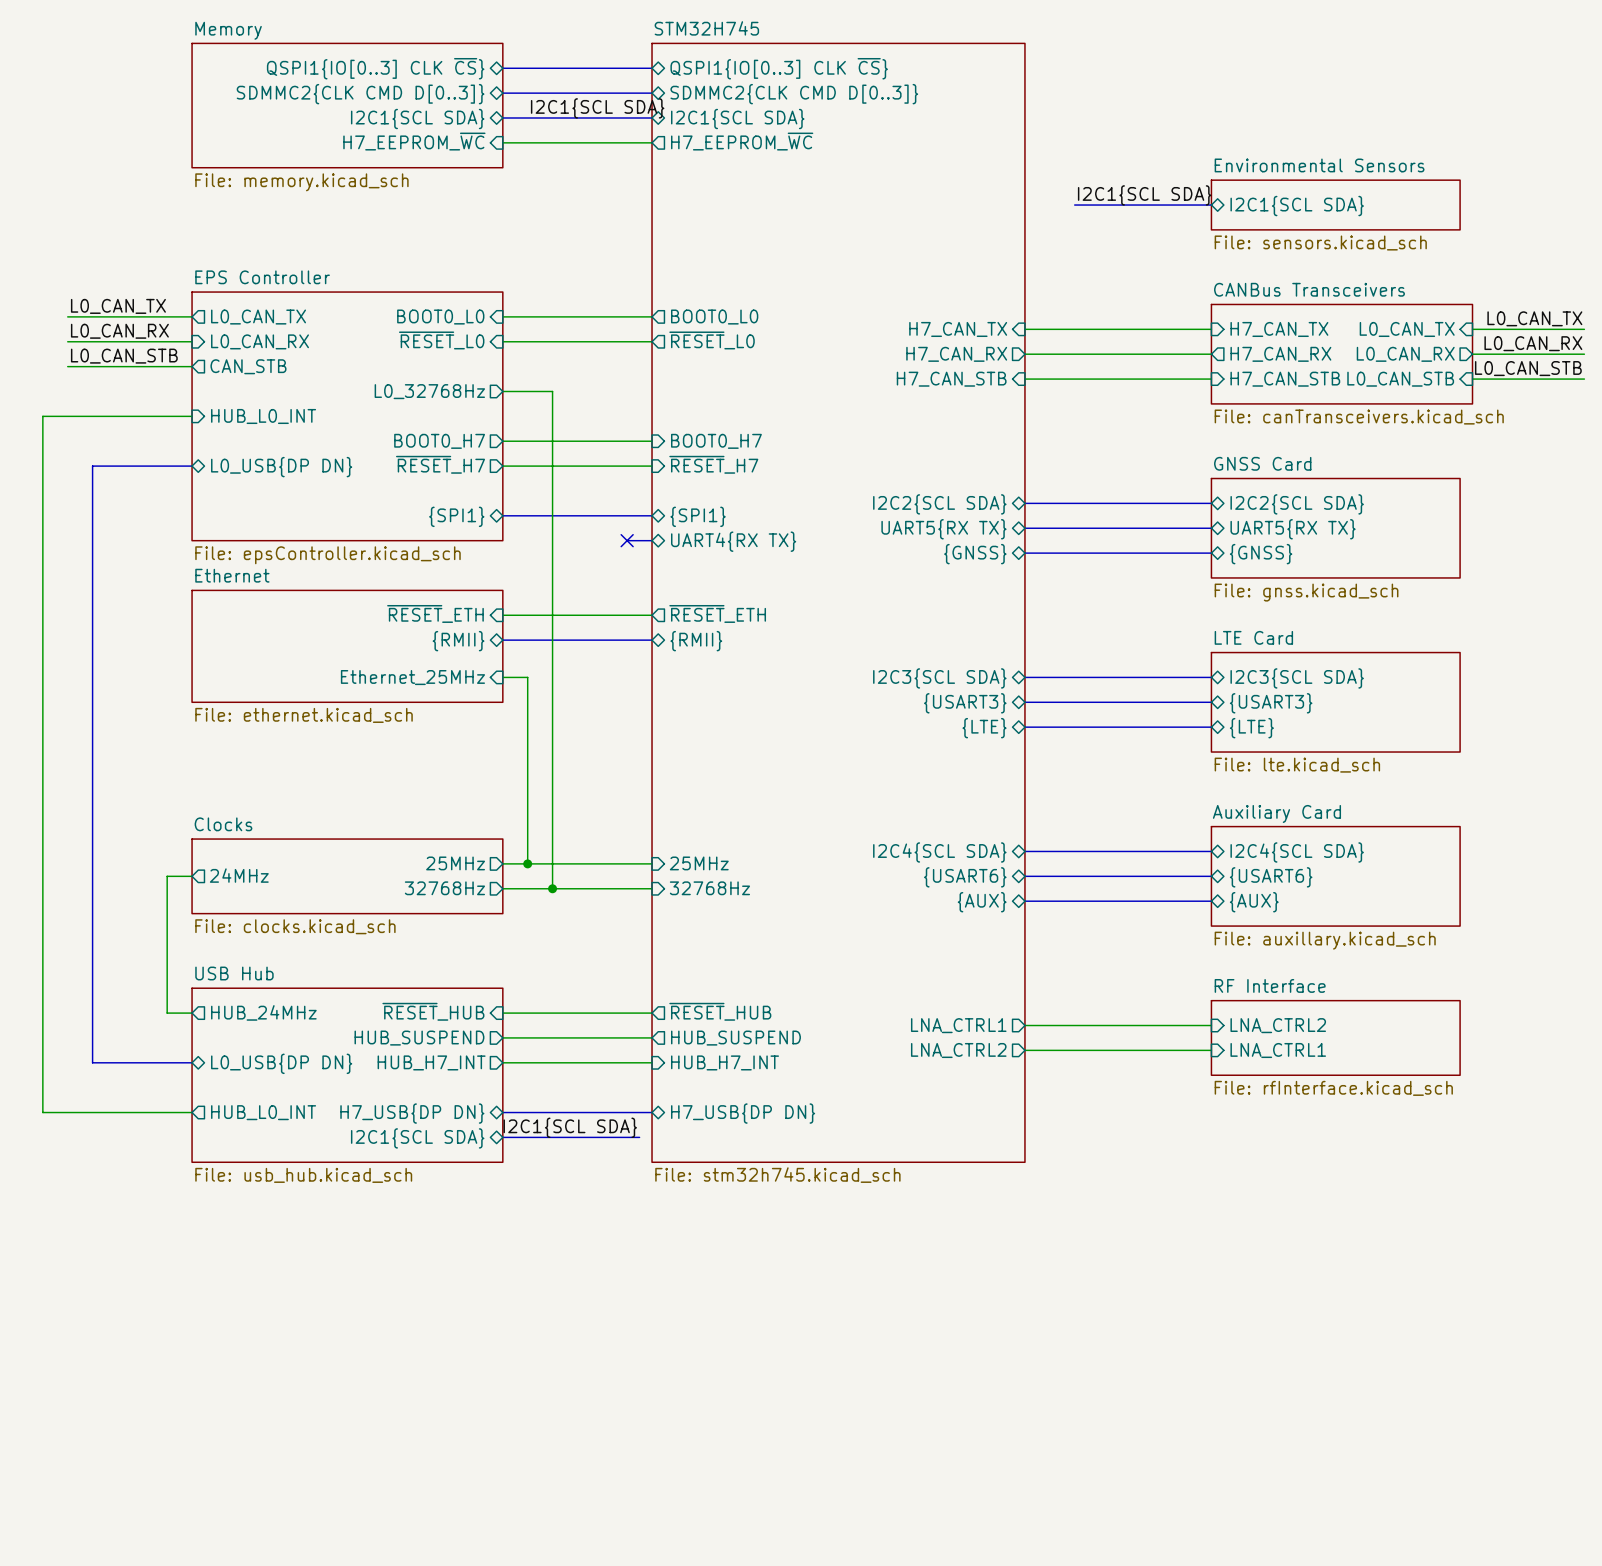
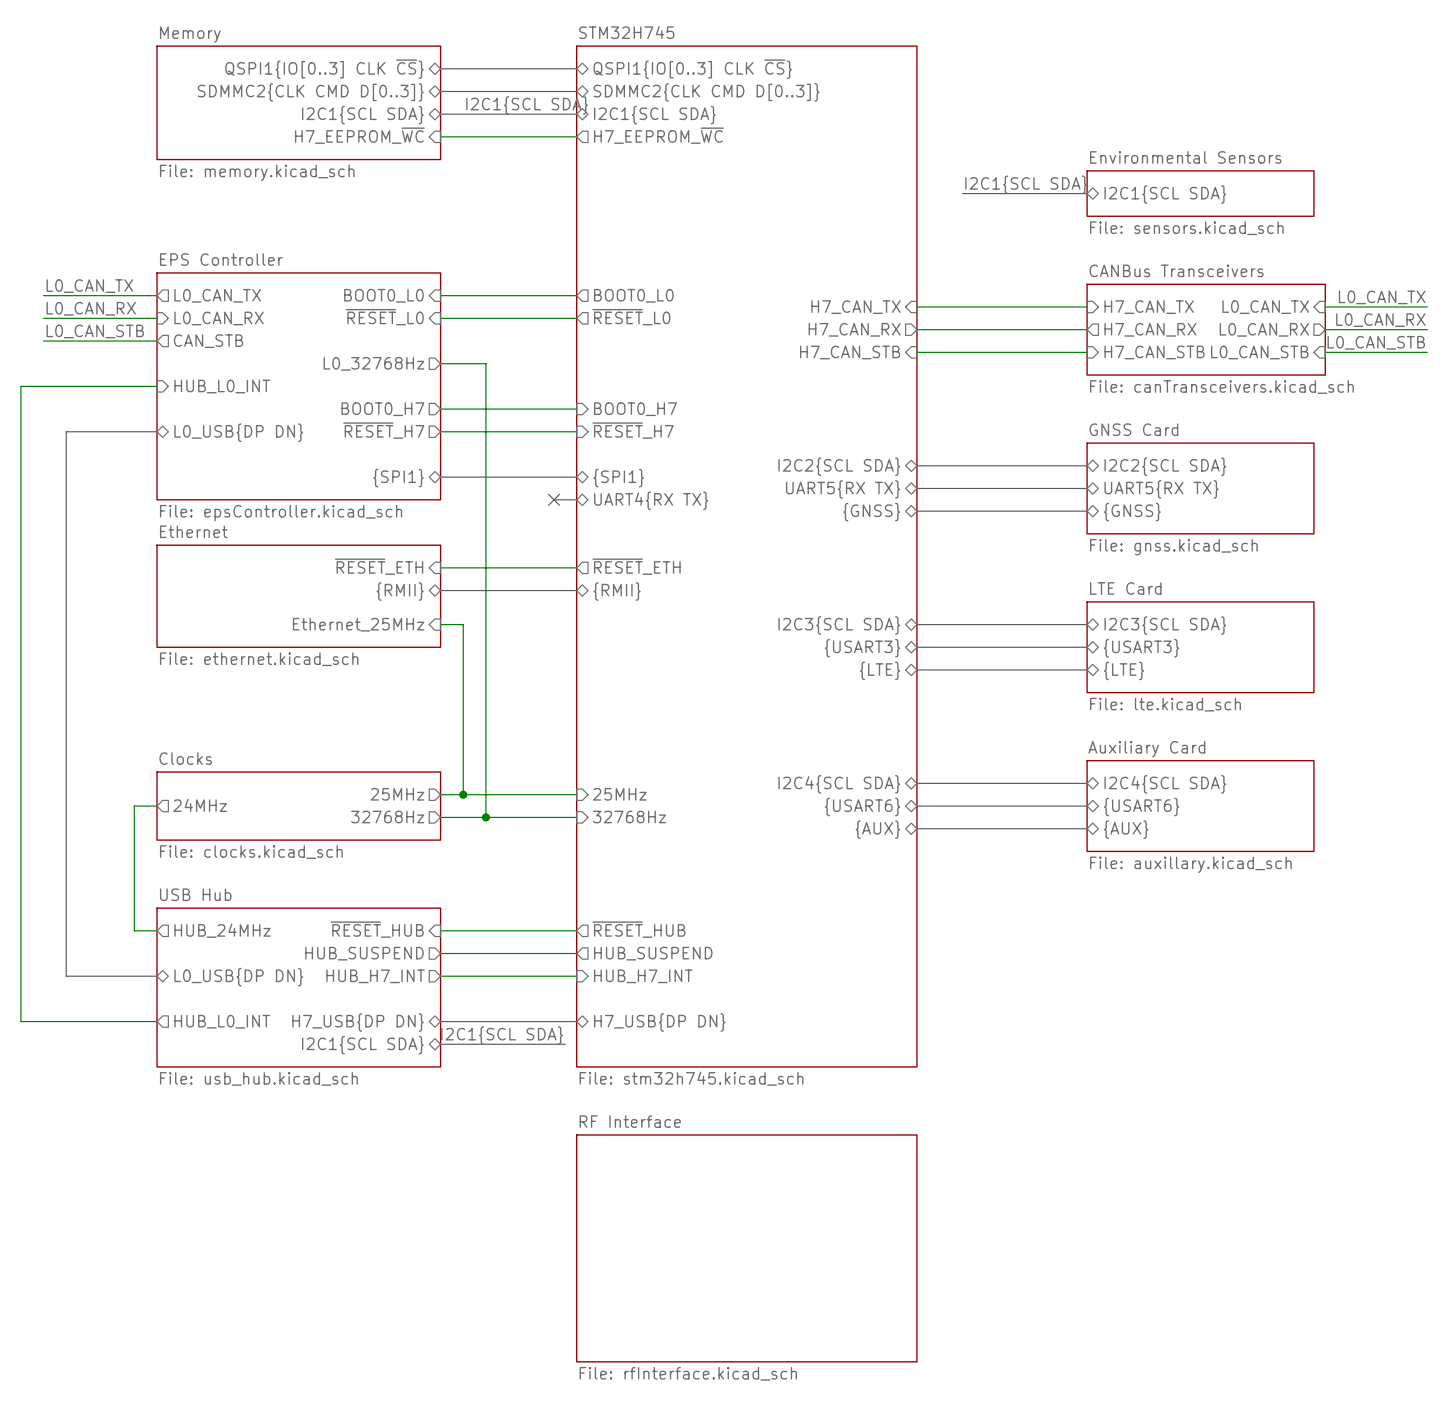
sheet pin: LNA_CTRL1 (958, 1025) -> none
wire: (1024, 1025) (1211, 1025) -> none
sheet pin: LNA_CTRL2 (1278, 1025) -> none
sheet RF Interface: File: rfInterface.kicad_sch (1335, 1037) -> none
sheet pin: LNA_CTRL2 (958, 1050) -> none
wire: (1024, 1050) (1211, 1050) -> none
sheet pin: LNA_CTRL1 (1278, 1050) -> none
sheet RF Interface: none -> File: rfInterface.kicad_sch (746, 1248)

